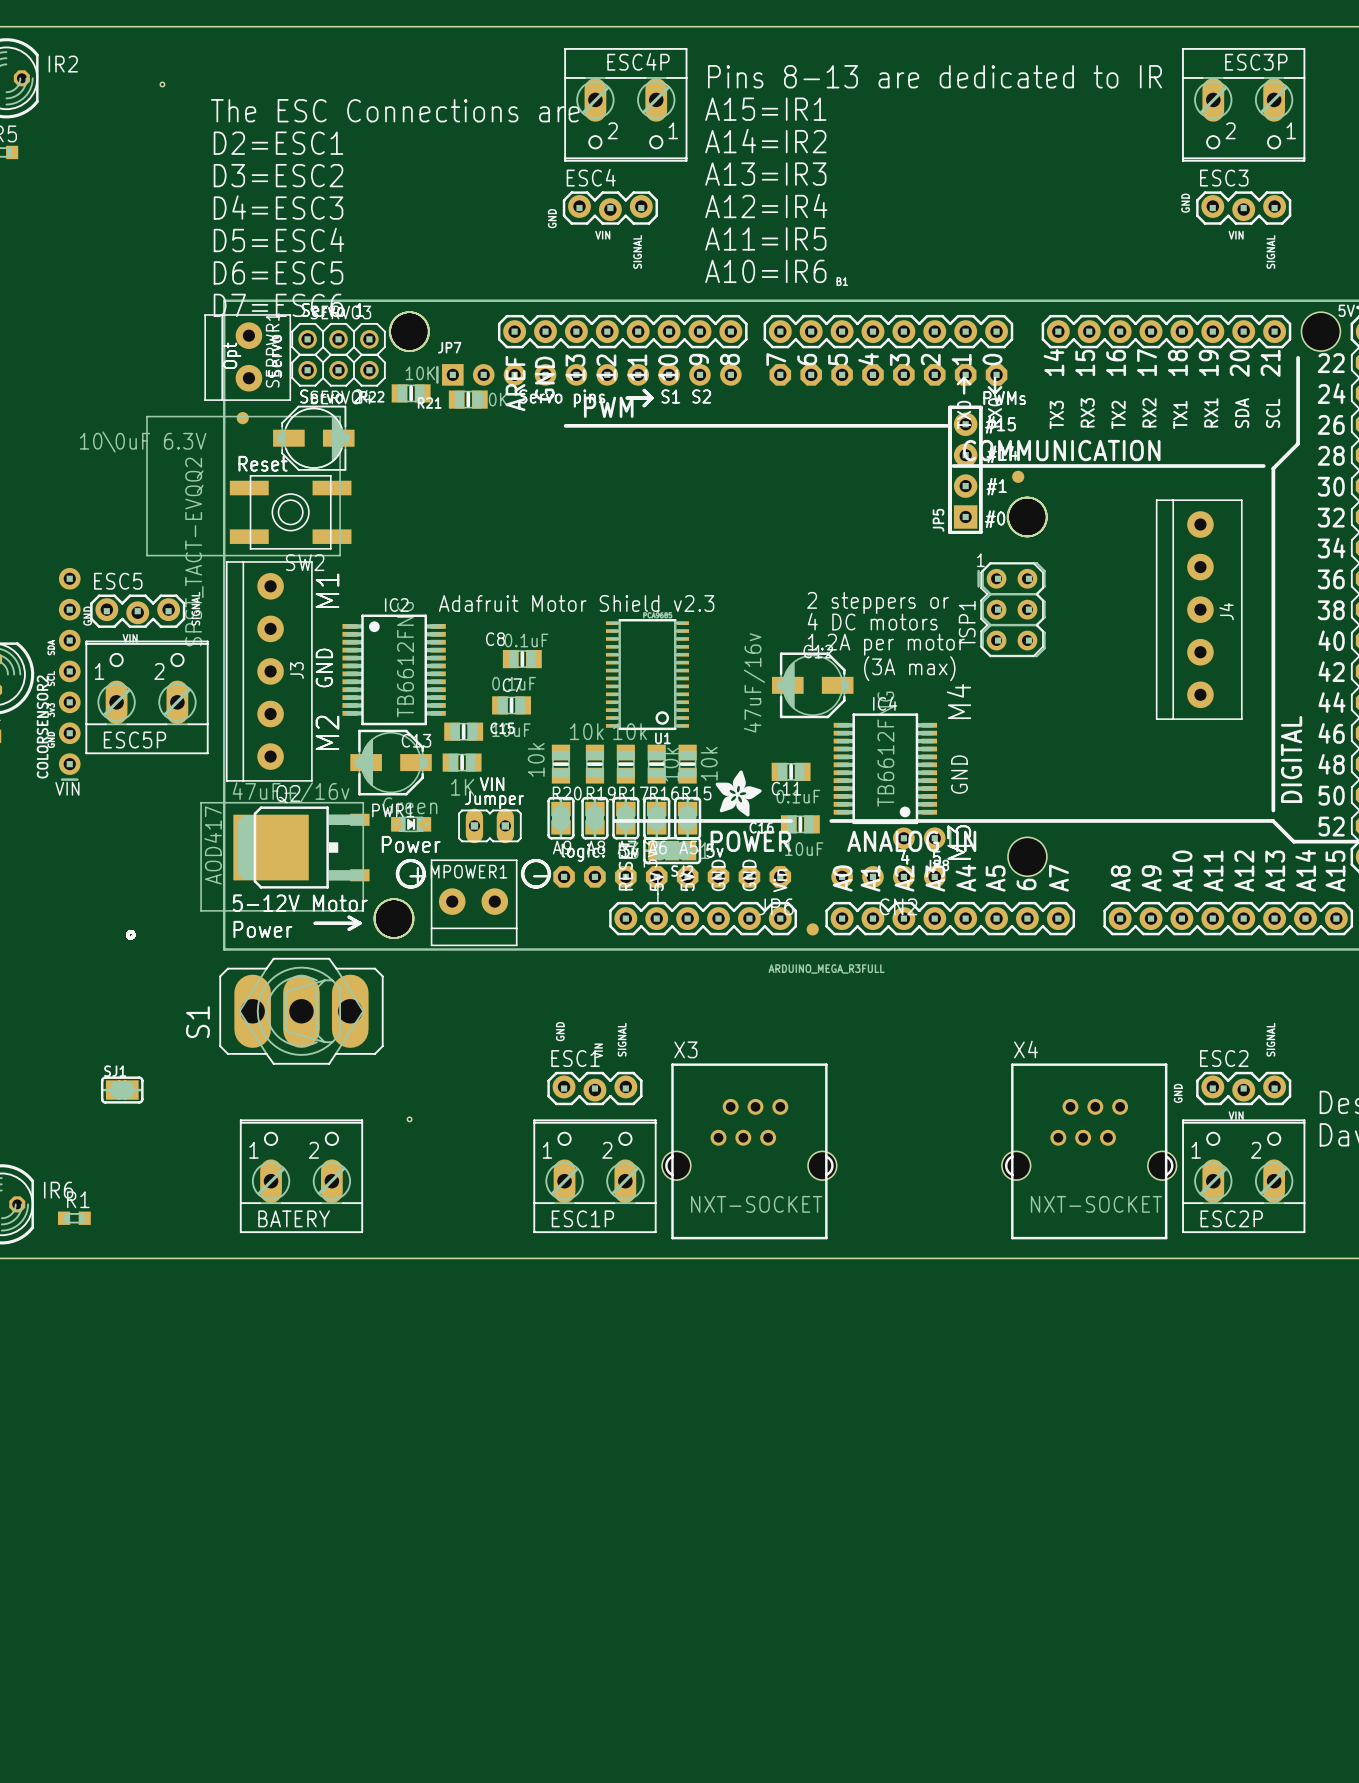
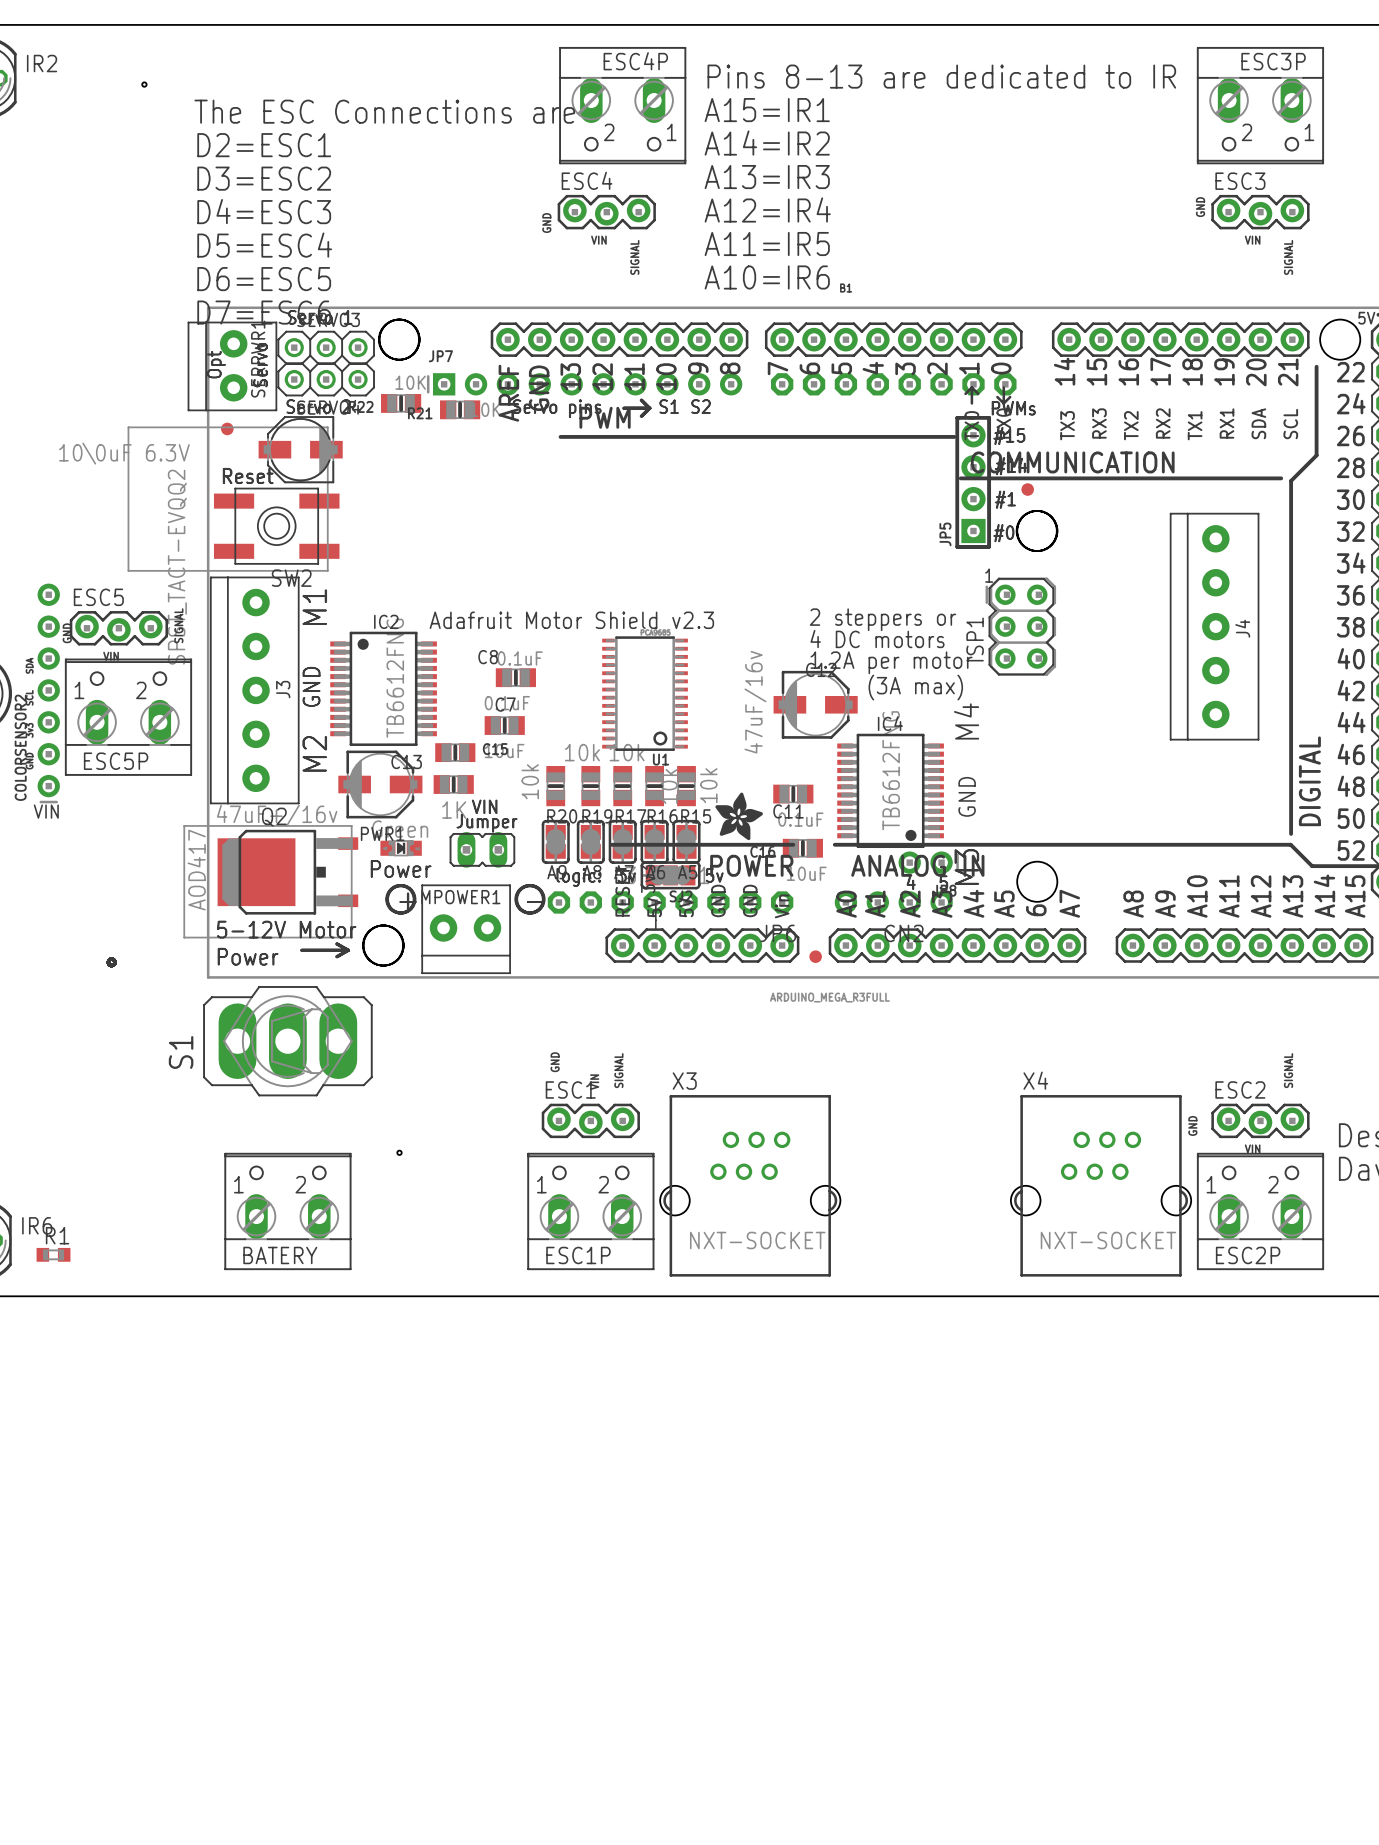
SJ1: (122, 1090) -> none

